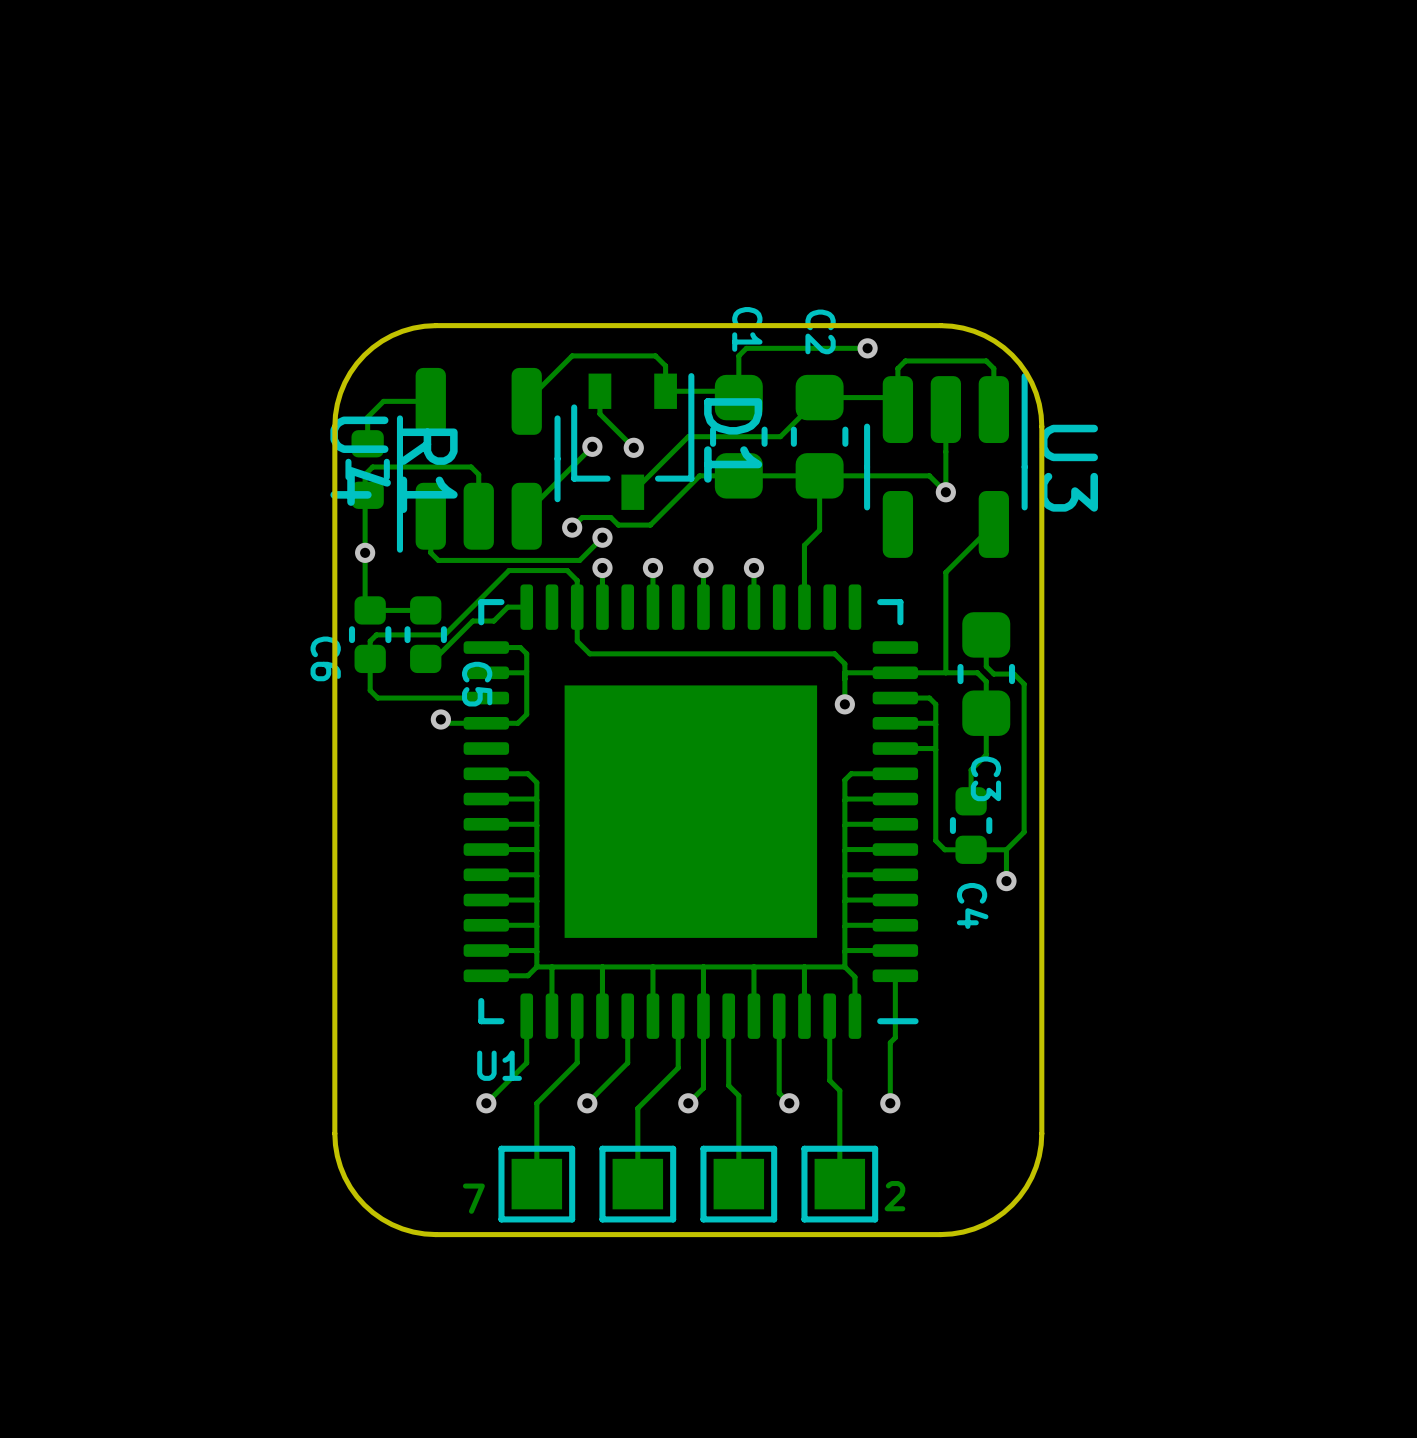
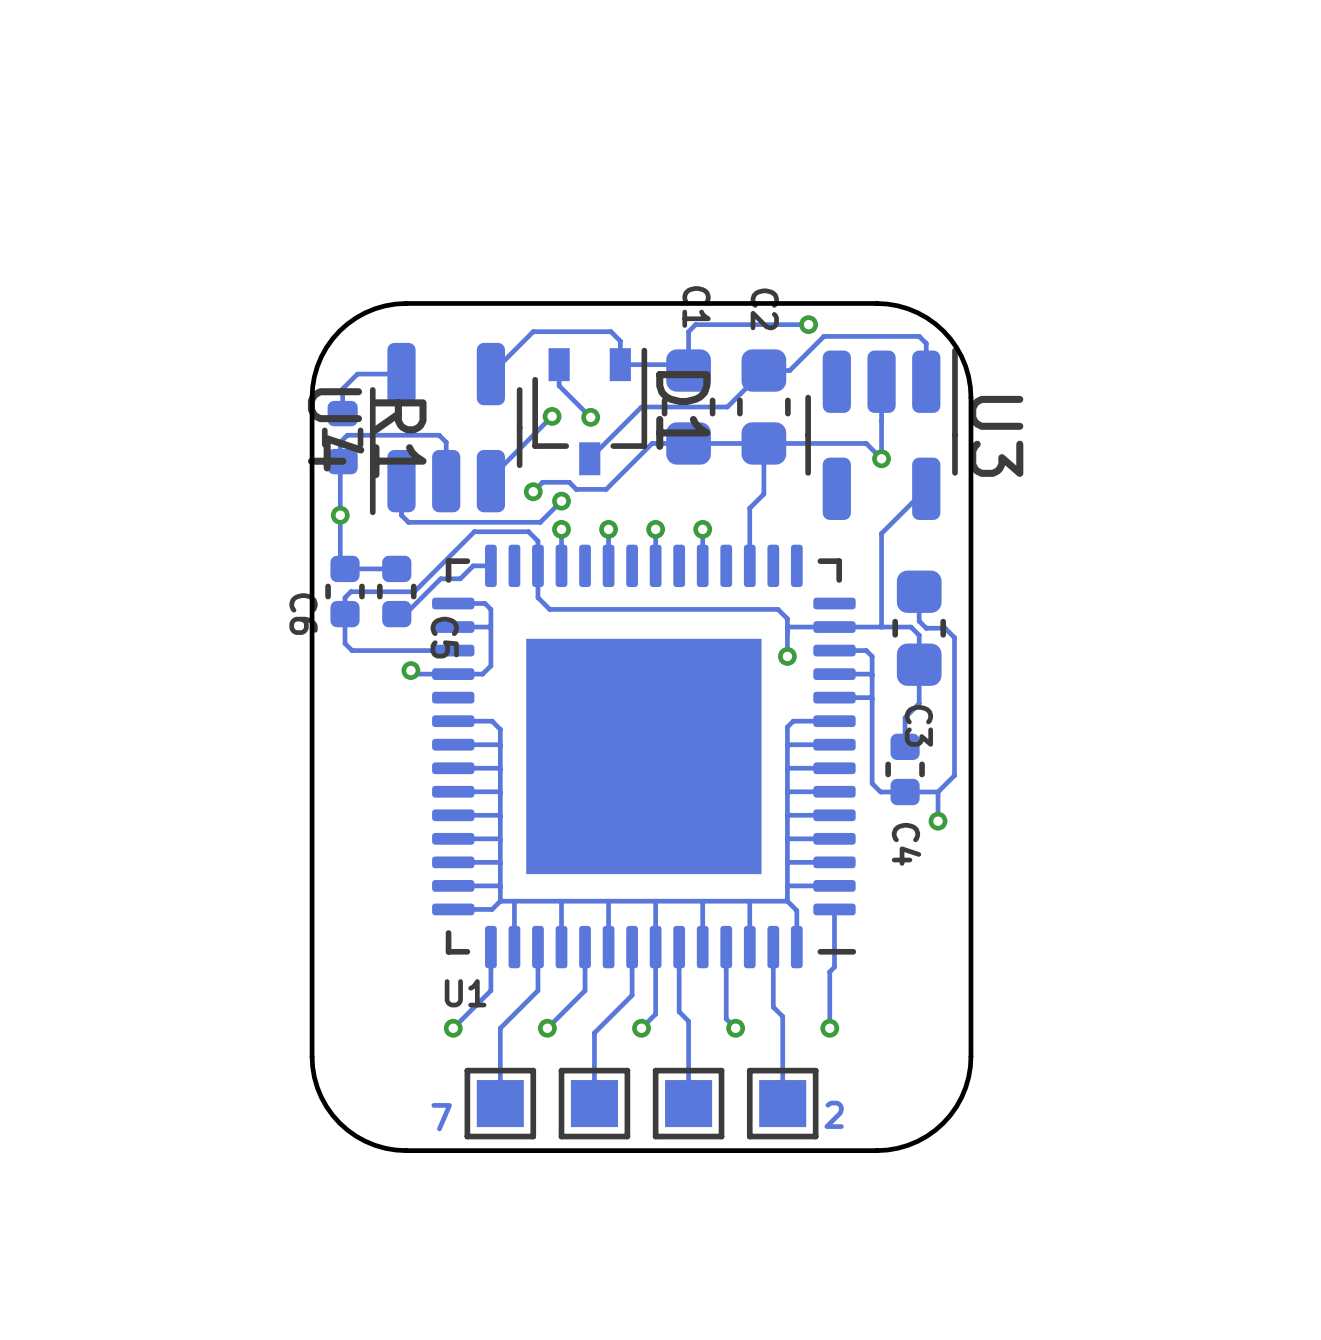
track: (905, 360) (897, 368) (897, 409) (885, 397) (847, 397) -> (843, 336) (823, 336) (789, 370)

